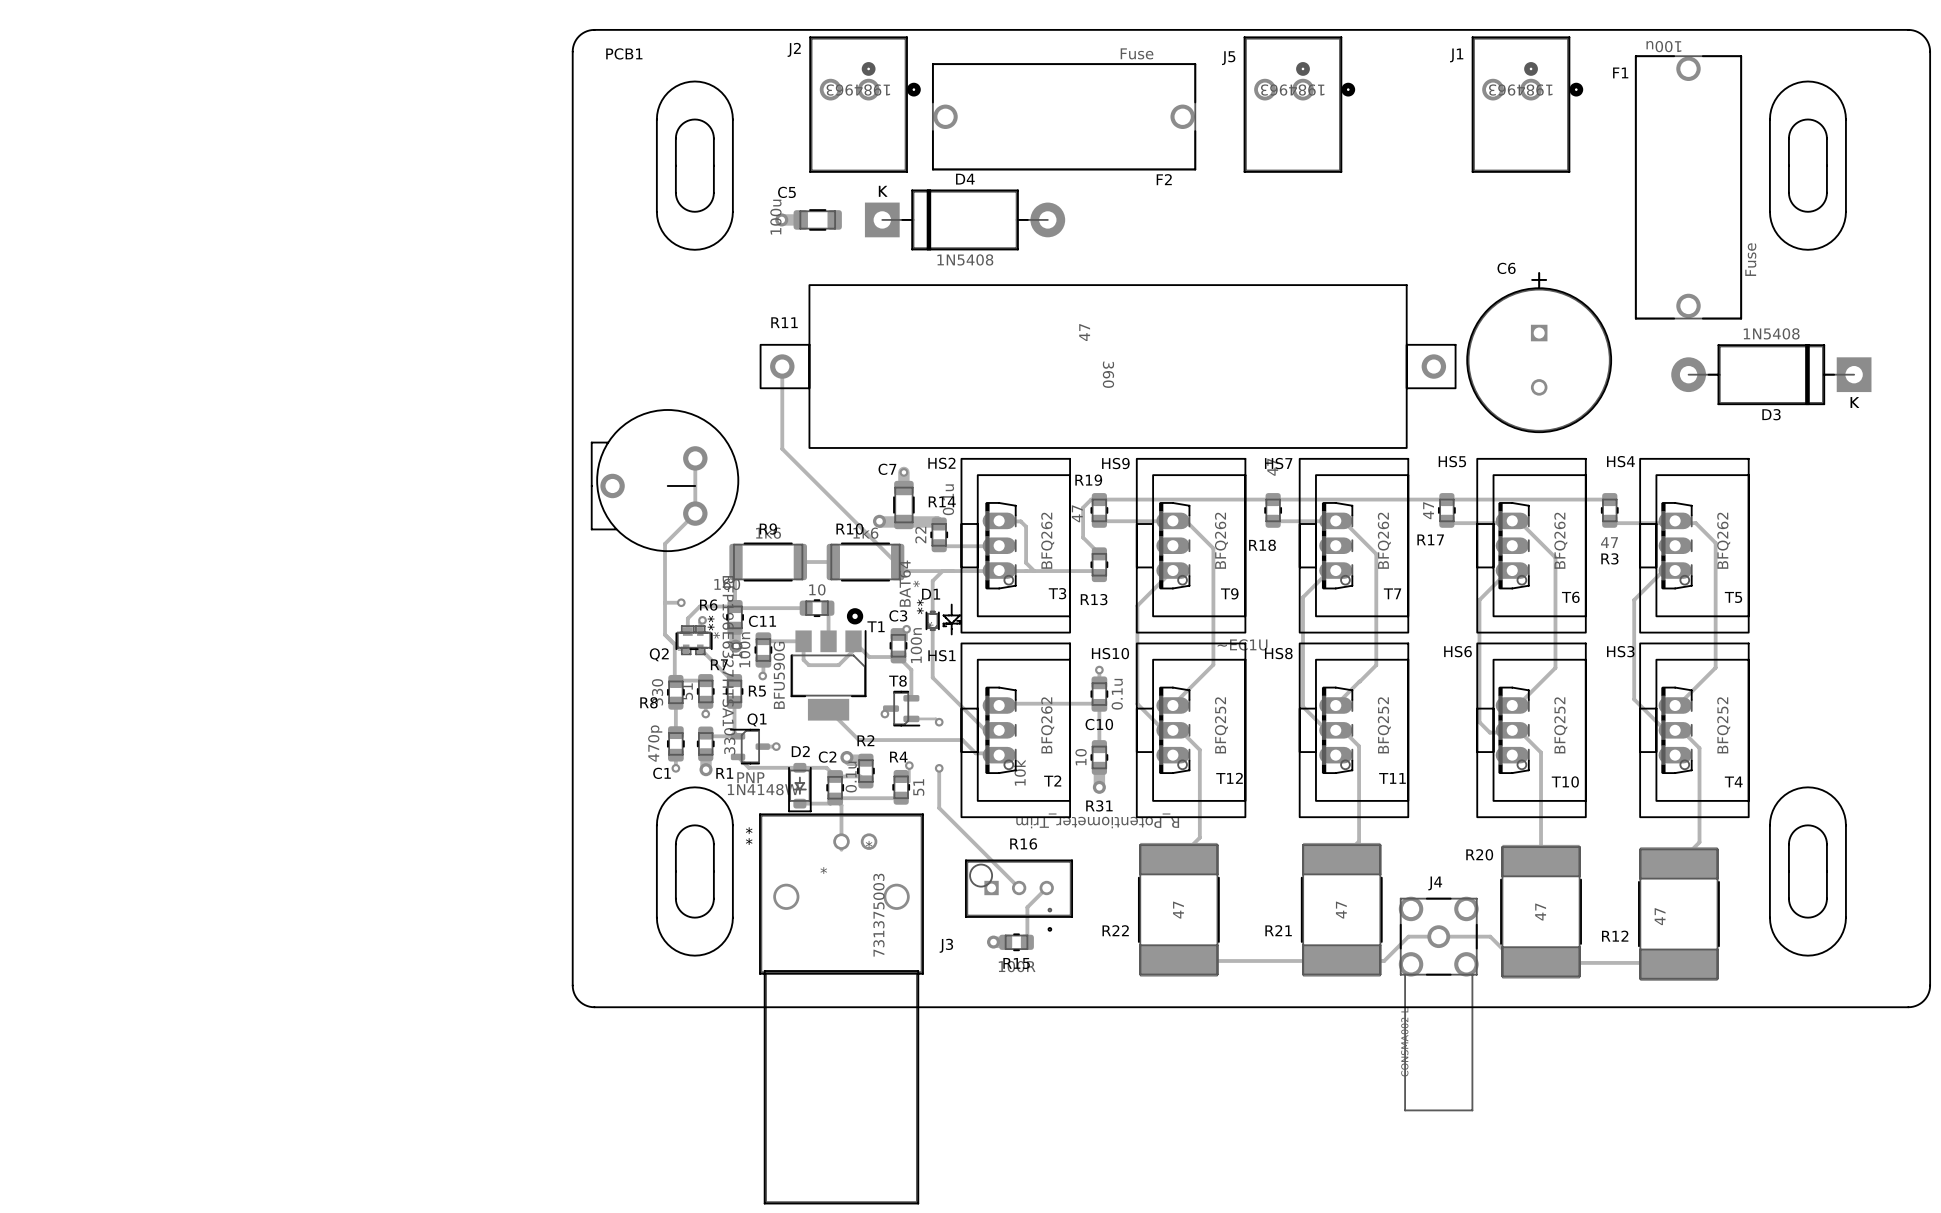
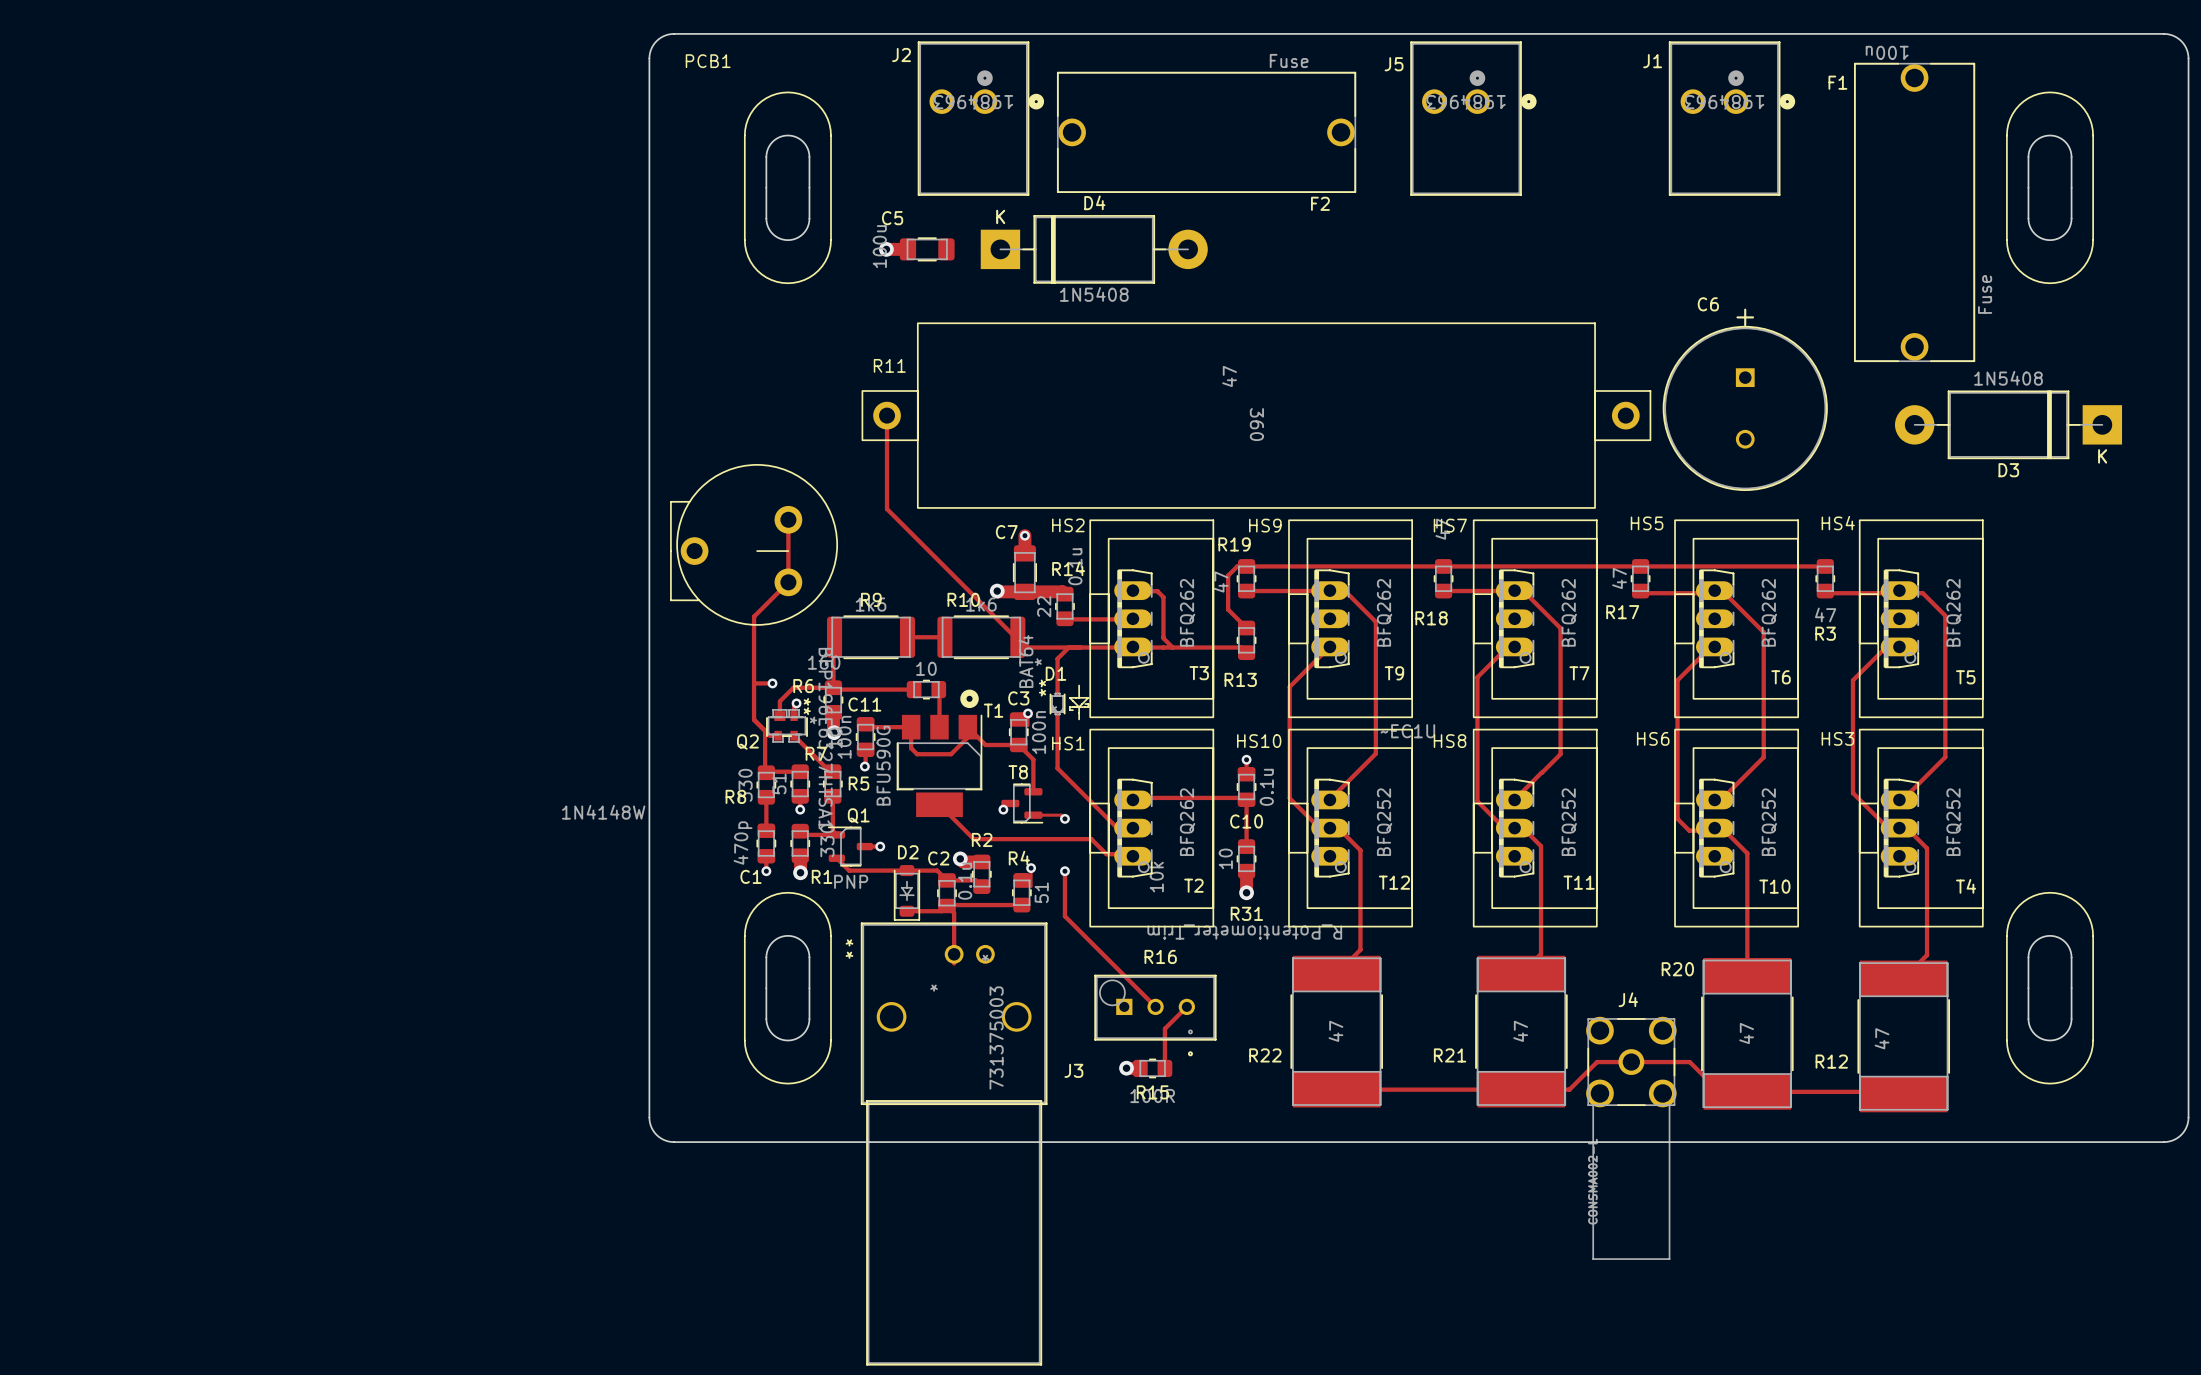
D2 value position: 1N4148W (763, 789) -> 1N4148W (603, 812)

